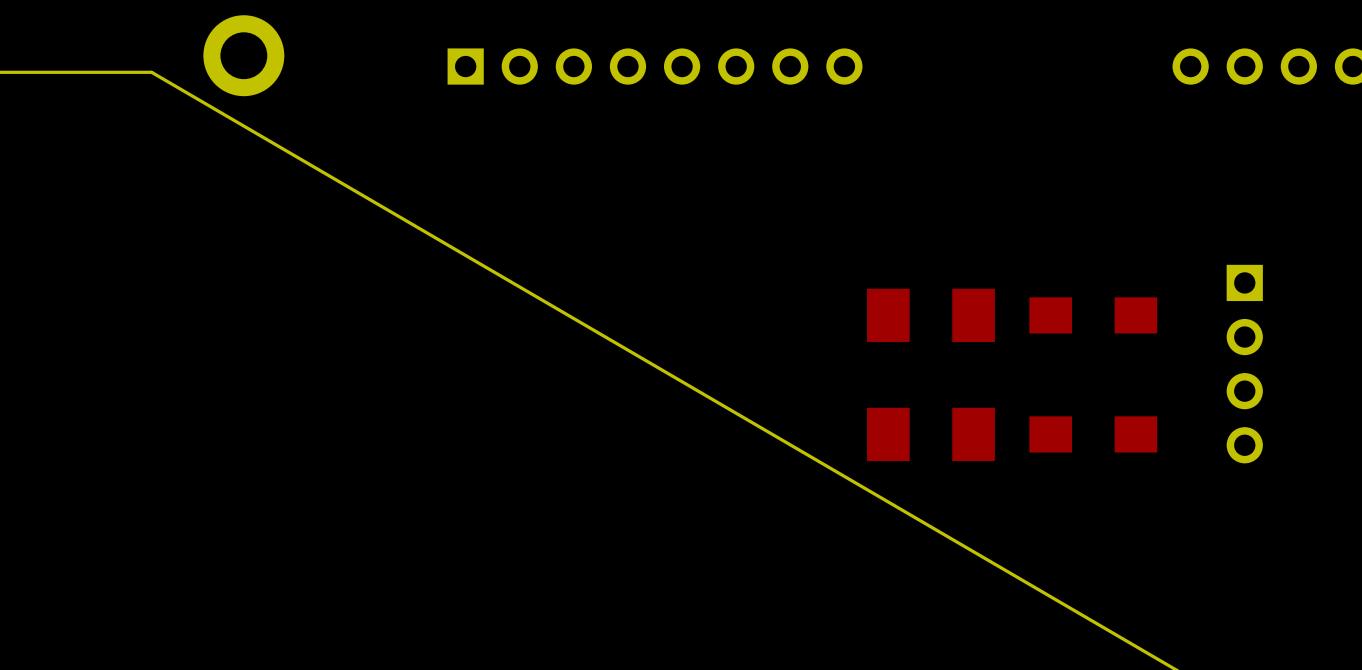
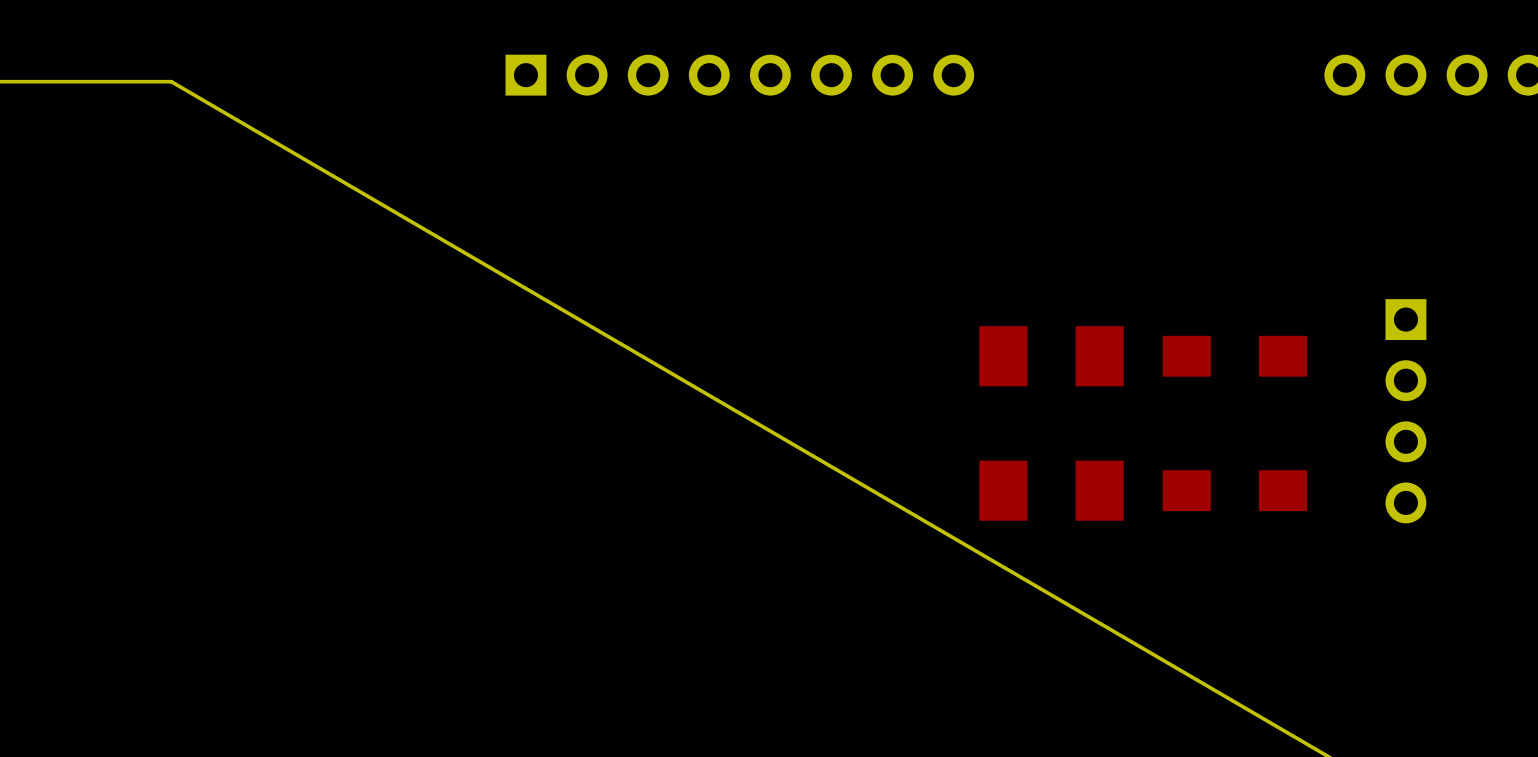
part: (243, 55) -> none

